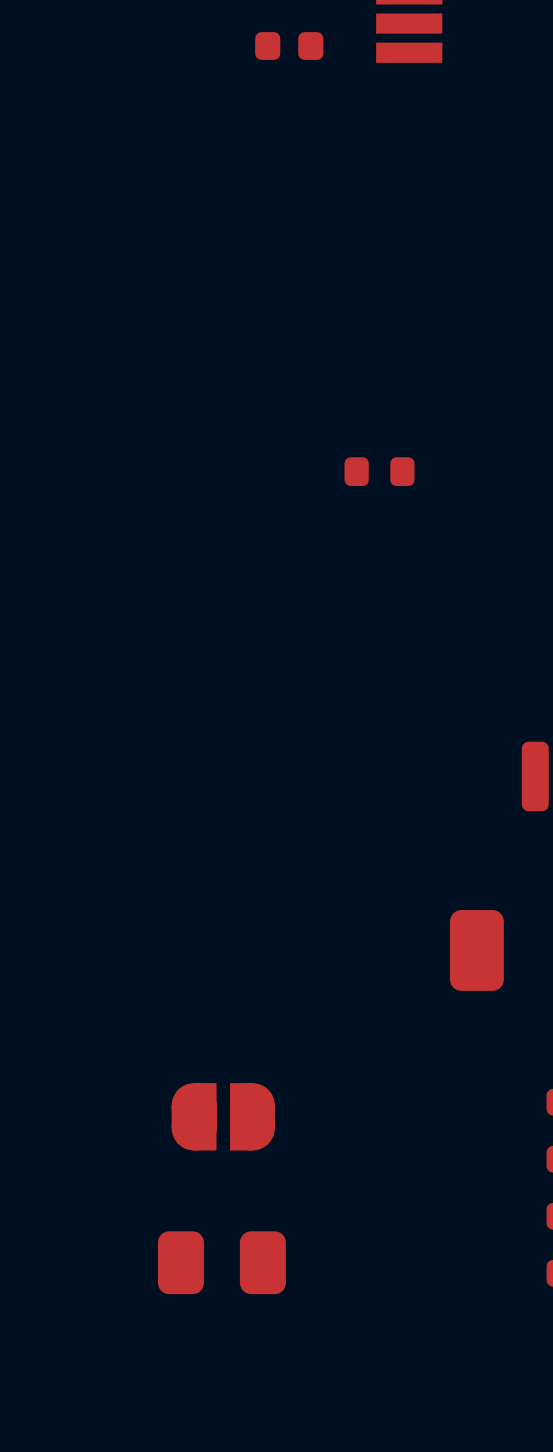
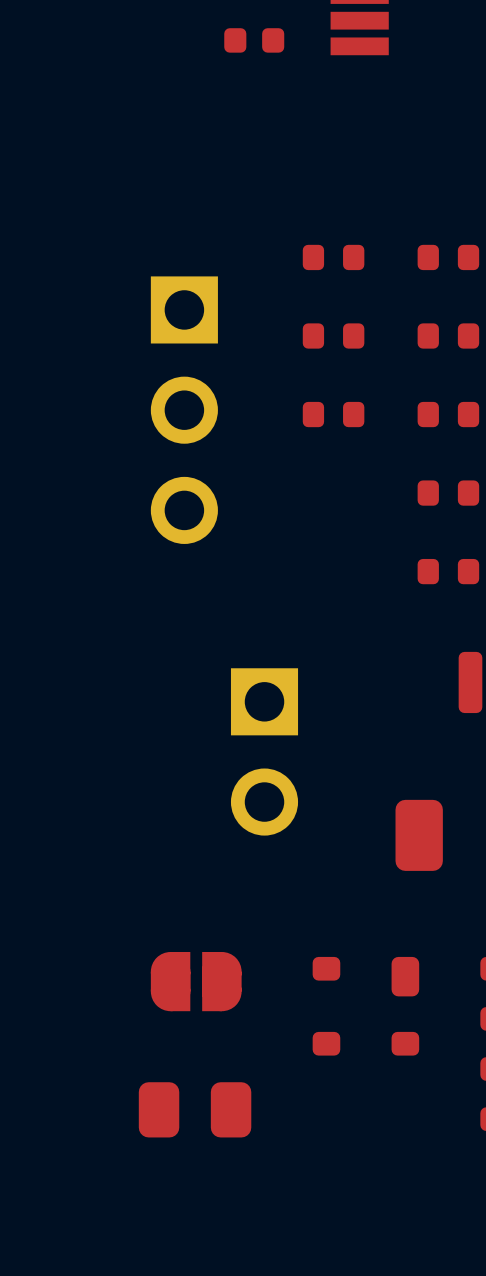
part: none -> (333, 257)
part: none -> (448, 257)
part: none -> (333, 336)
part: none -> (448, 336)
part: none -> (184, 410)
part: none -> (448, 414)
part: none -> (448, 493)
part: none -> (448, 571)
part: none -> (264, 751)
part: none -> (365, 1006)

